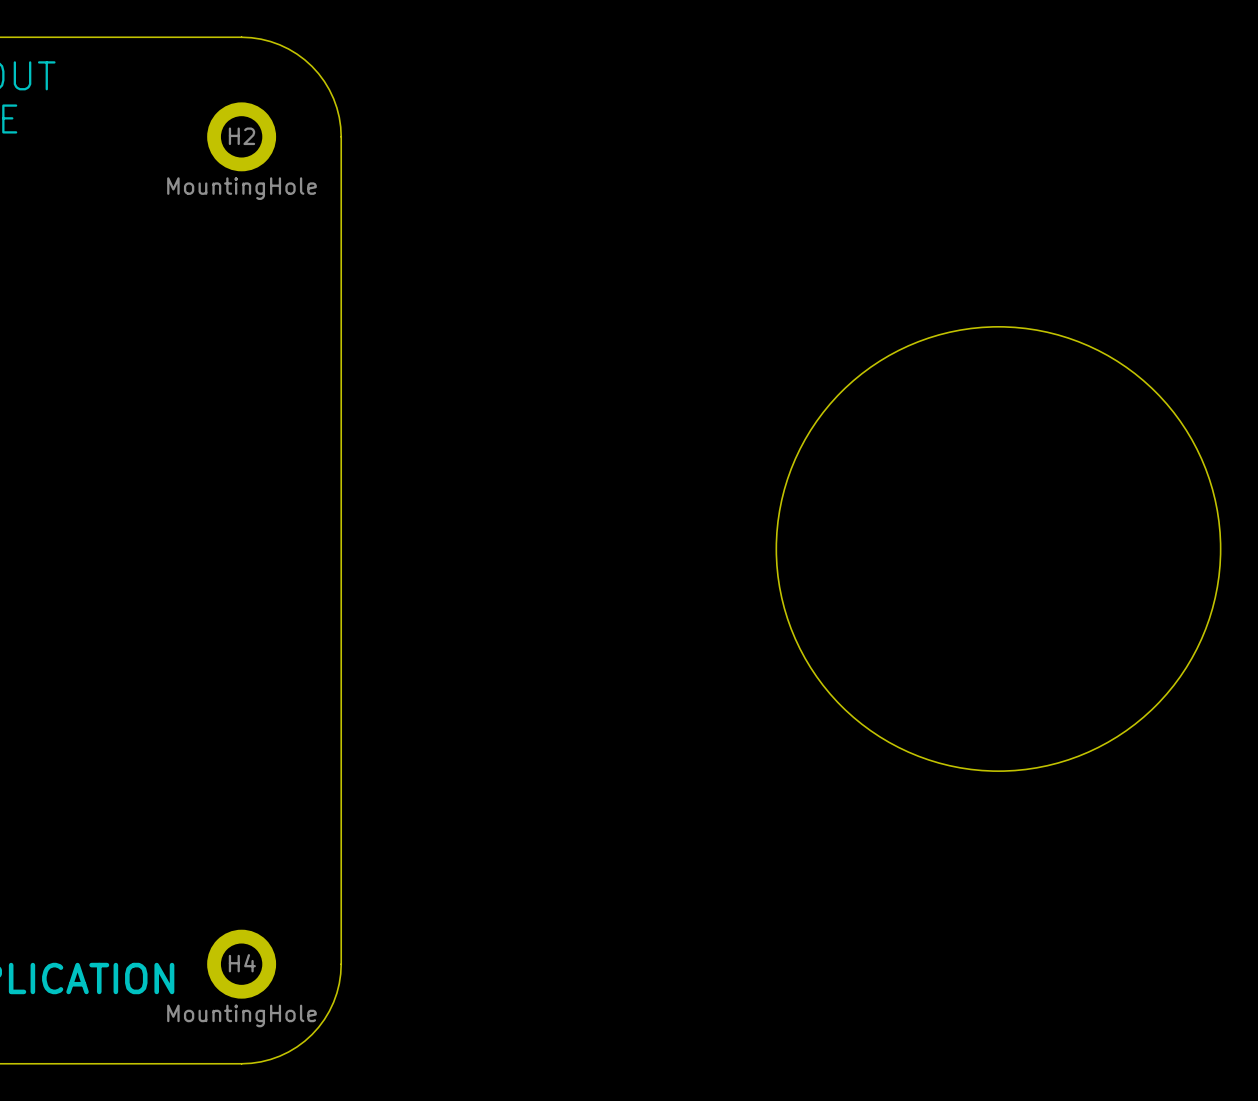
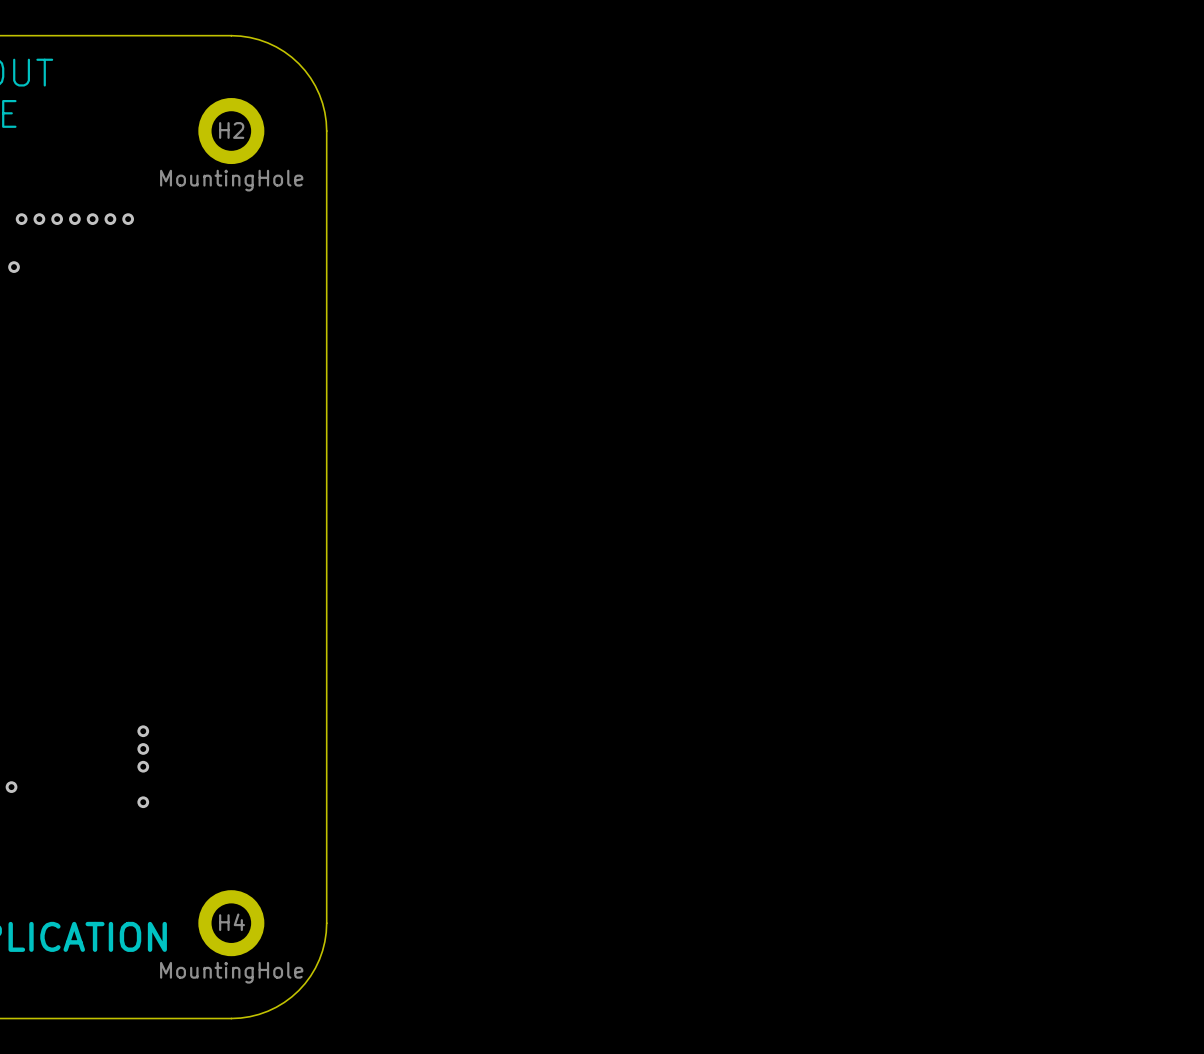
via: none -> (21, 219)
via: none -> (39, 219)
via: none -> (57, 219)
via: none -> (74, 219)
via: none -> (92, 219)
via: none -> (110, 219)
via: none -> (128, 219)
via: none -> (14, 267)
round board edge: [775, 326, 1222, 772] -> none
via: none -> (143, 731)
via: none -> (143, 748)
via: none -> (143, 766)
via: none -> (11, 787)
via: none -> (143, 802)

